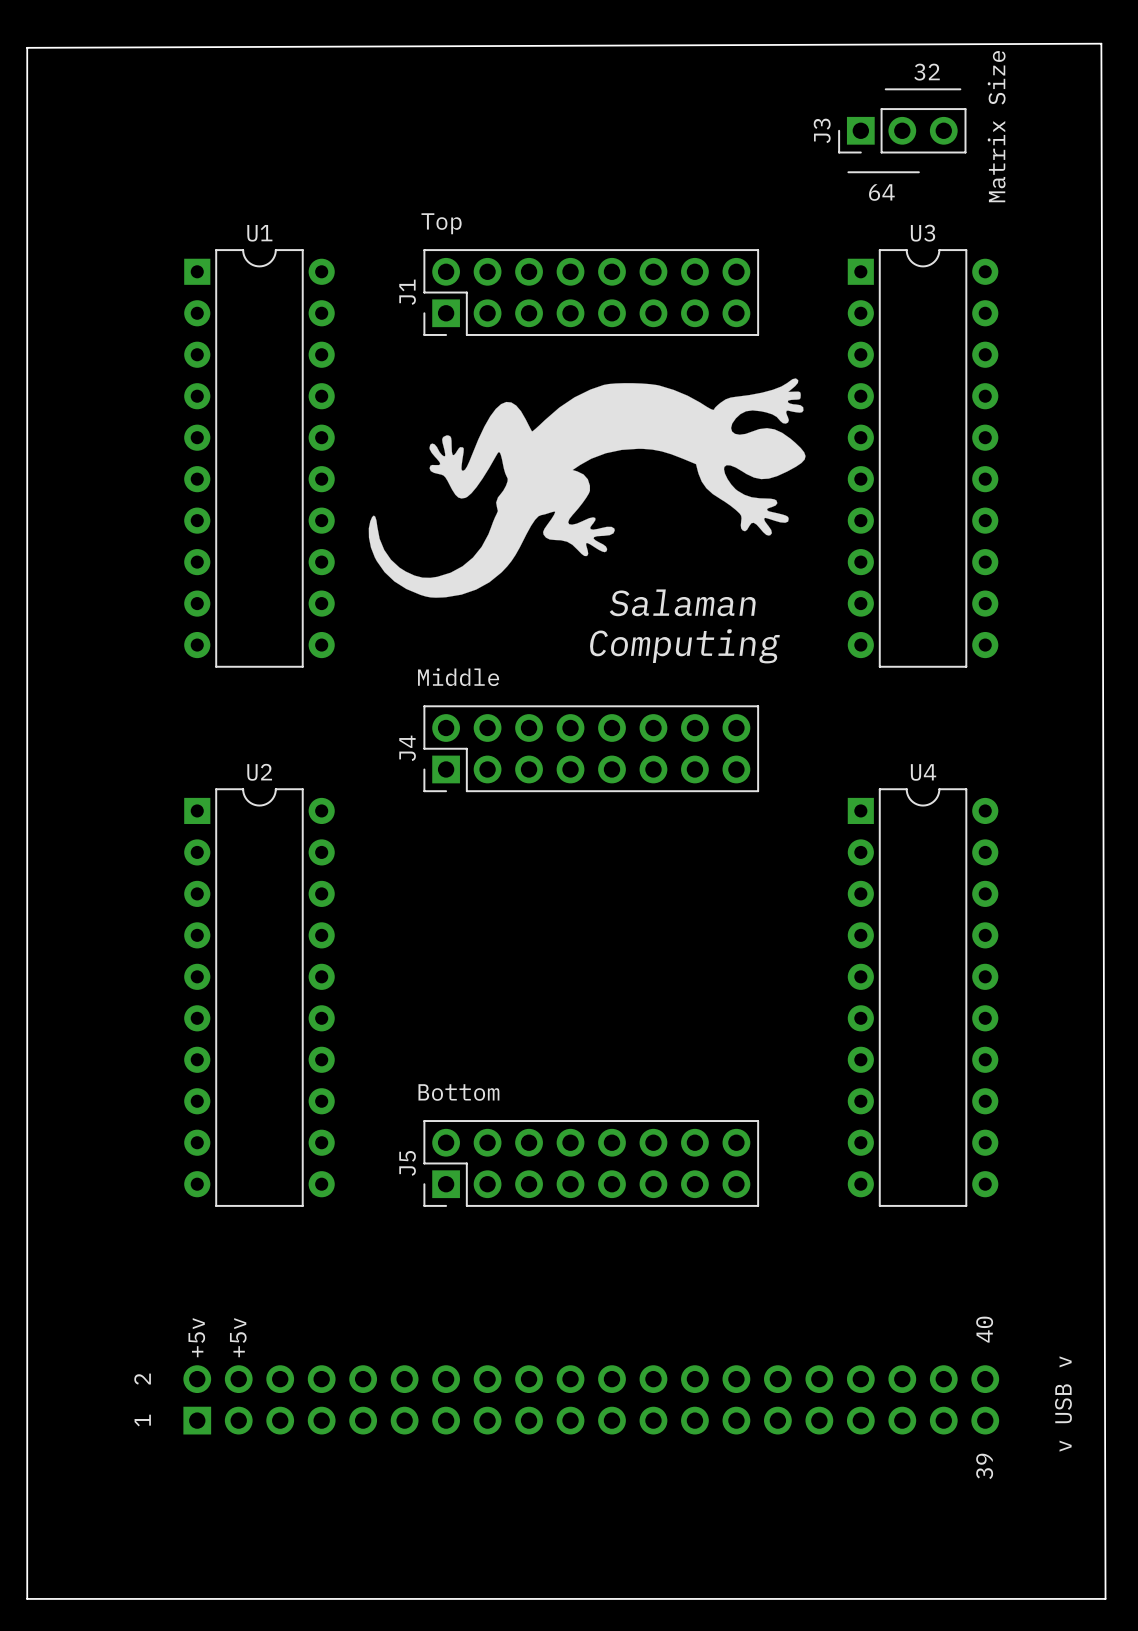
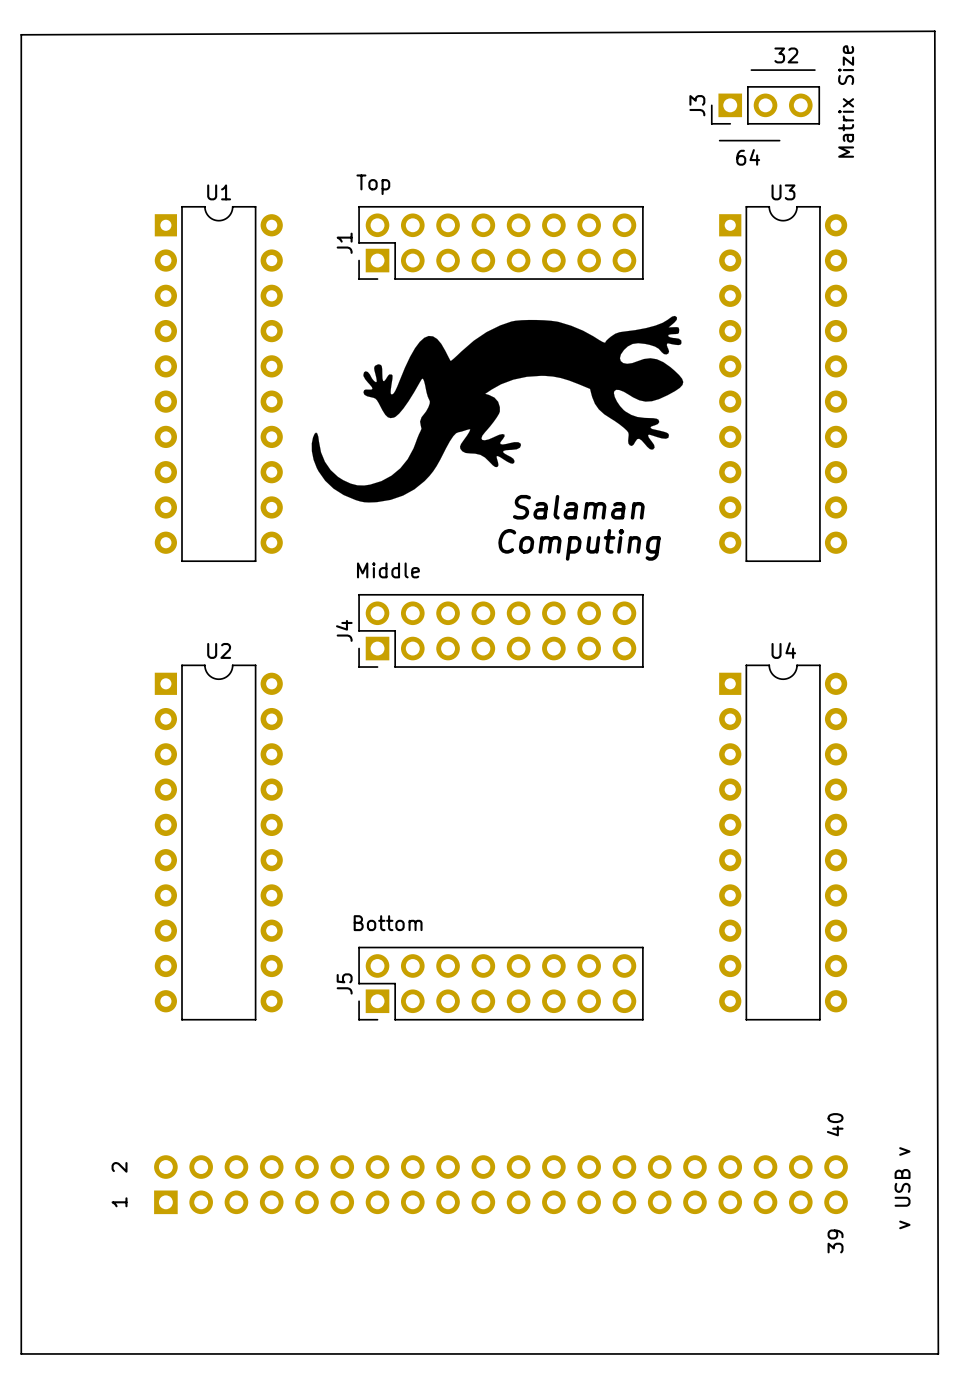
text: +5v (196, 1337) -> none
text: +5v (238, 1337) -> none

